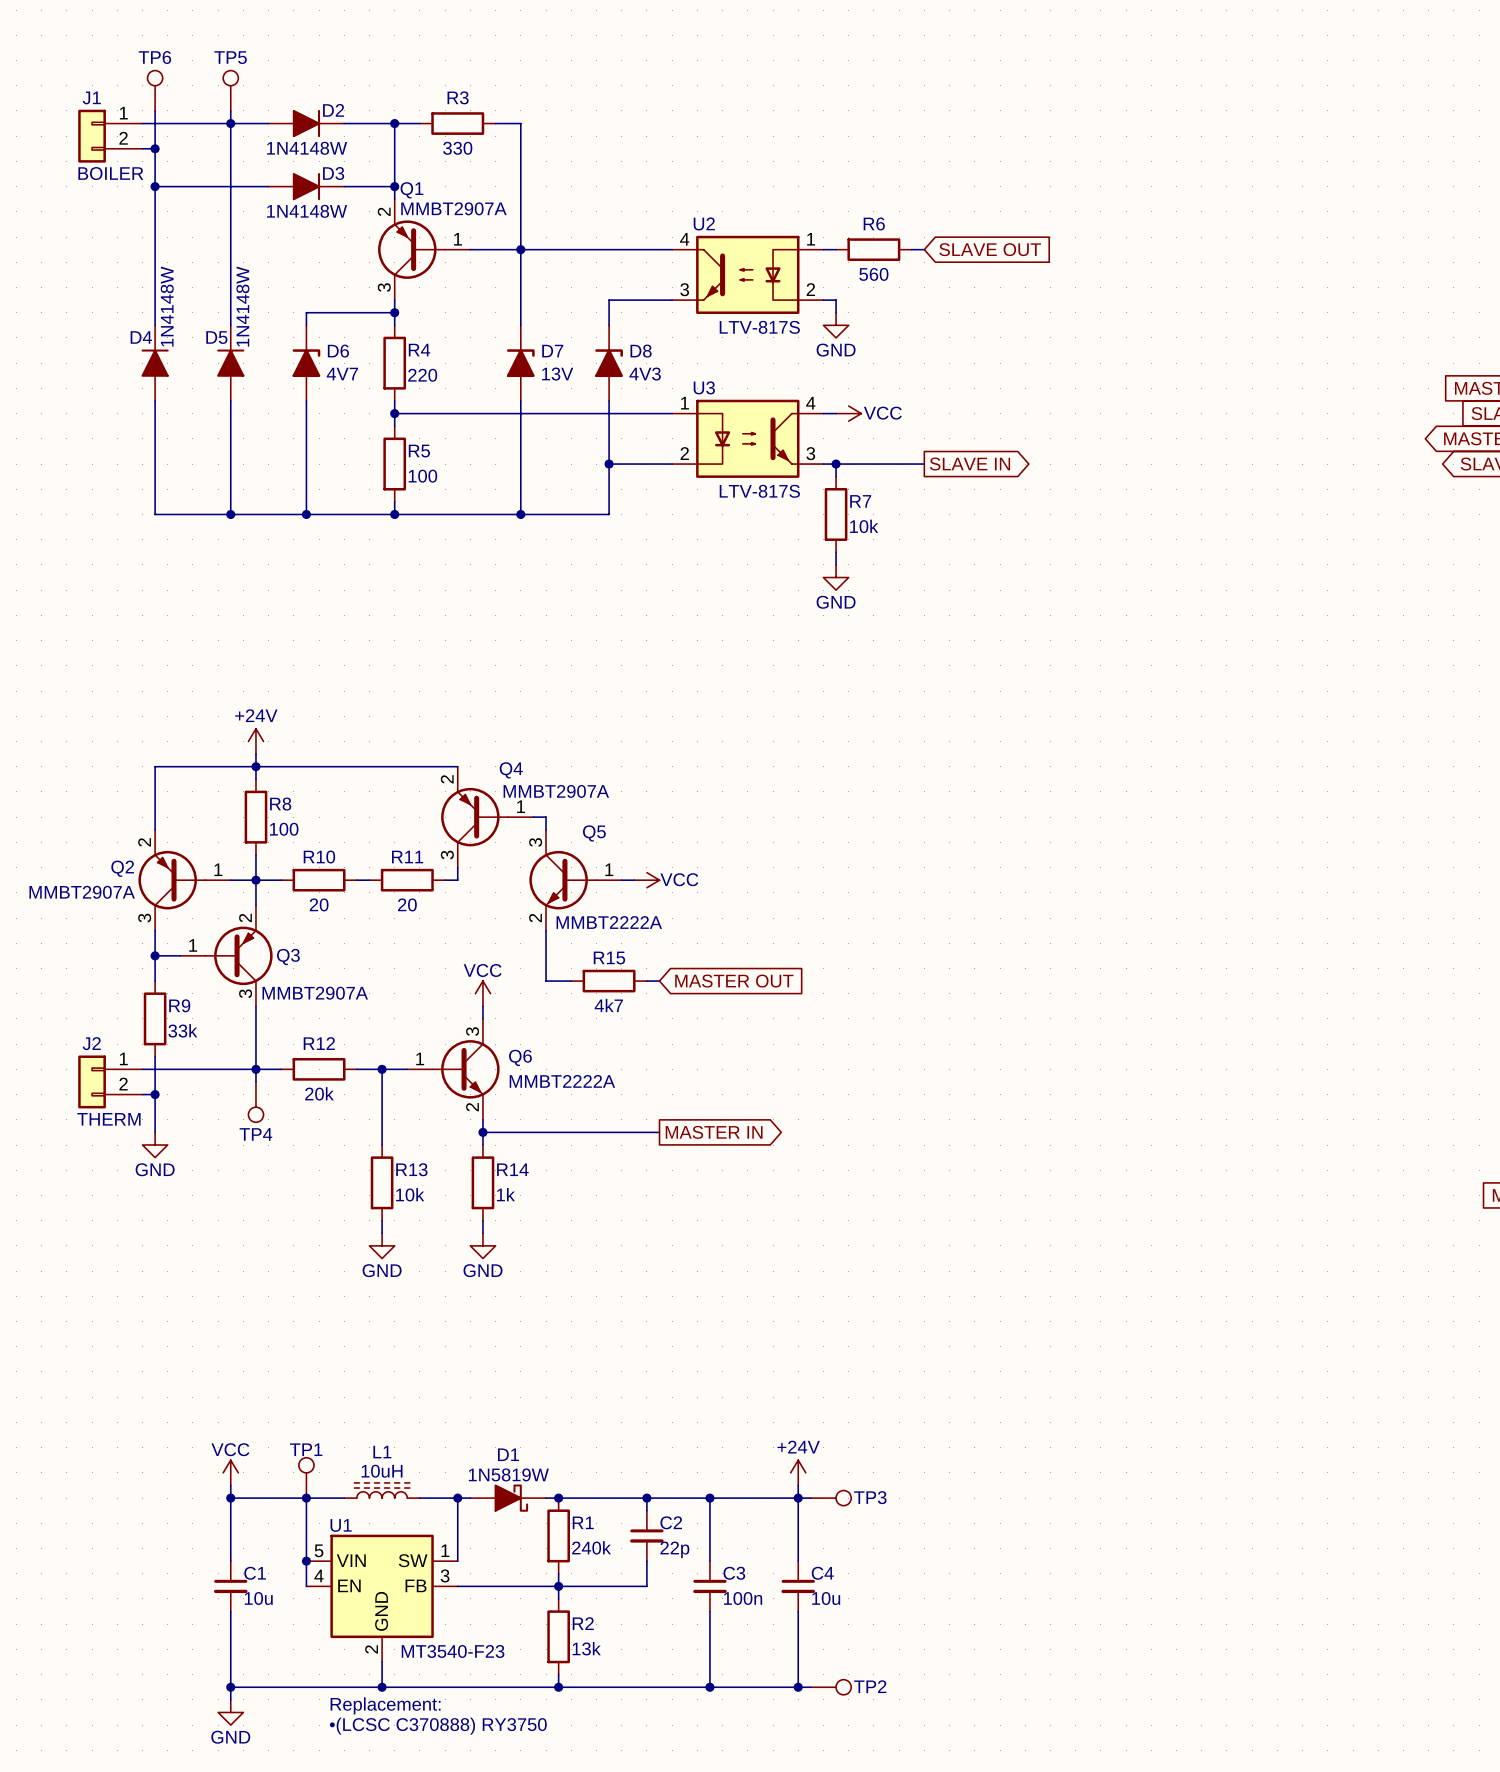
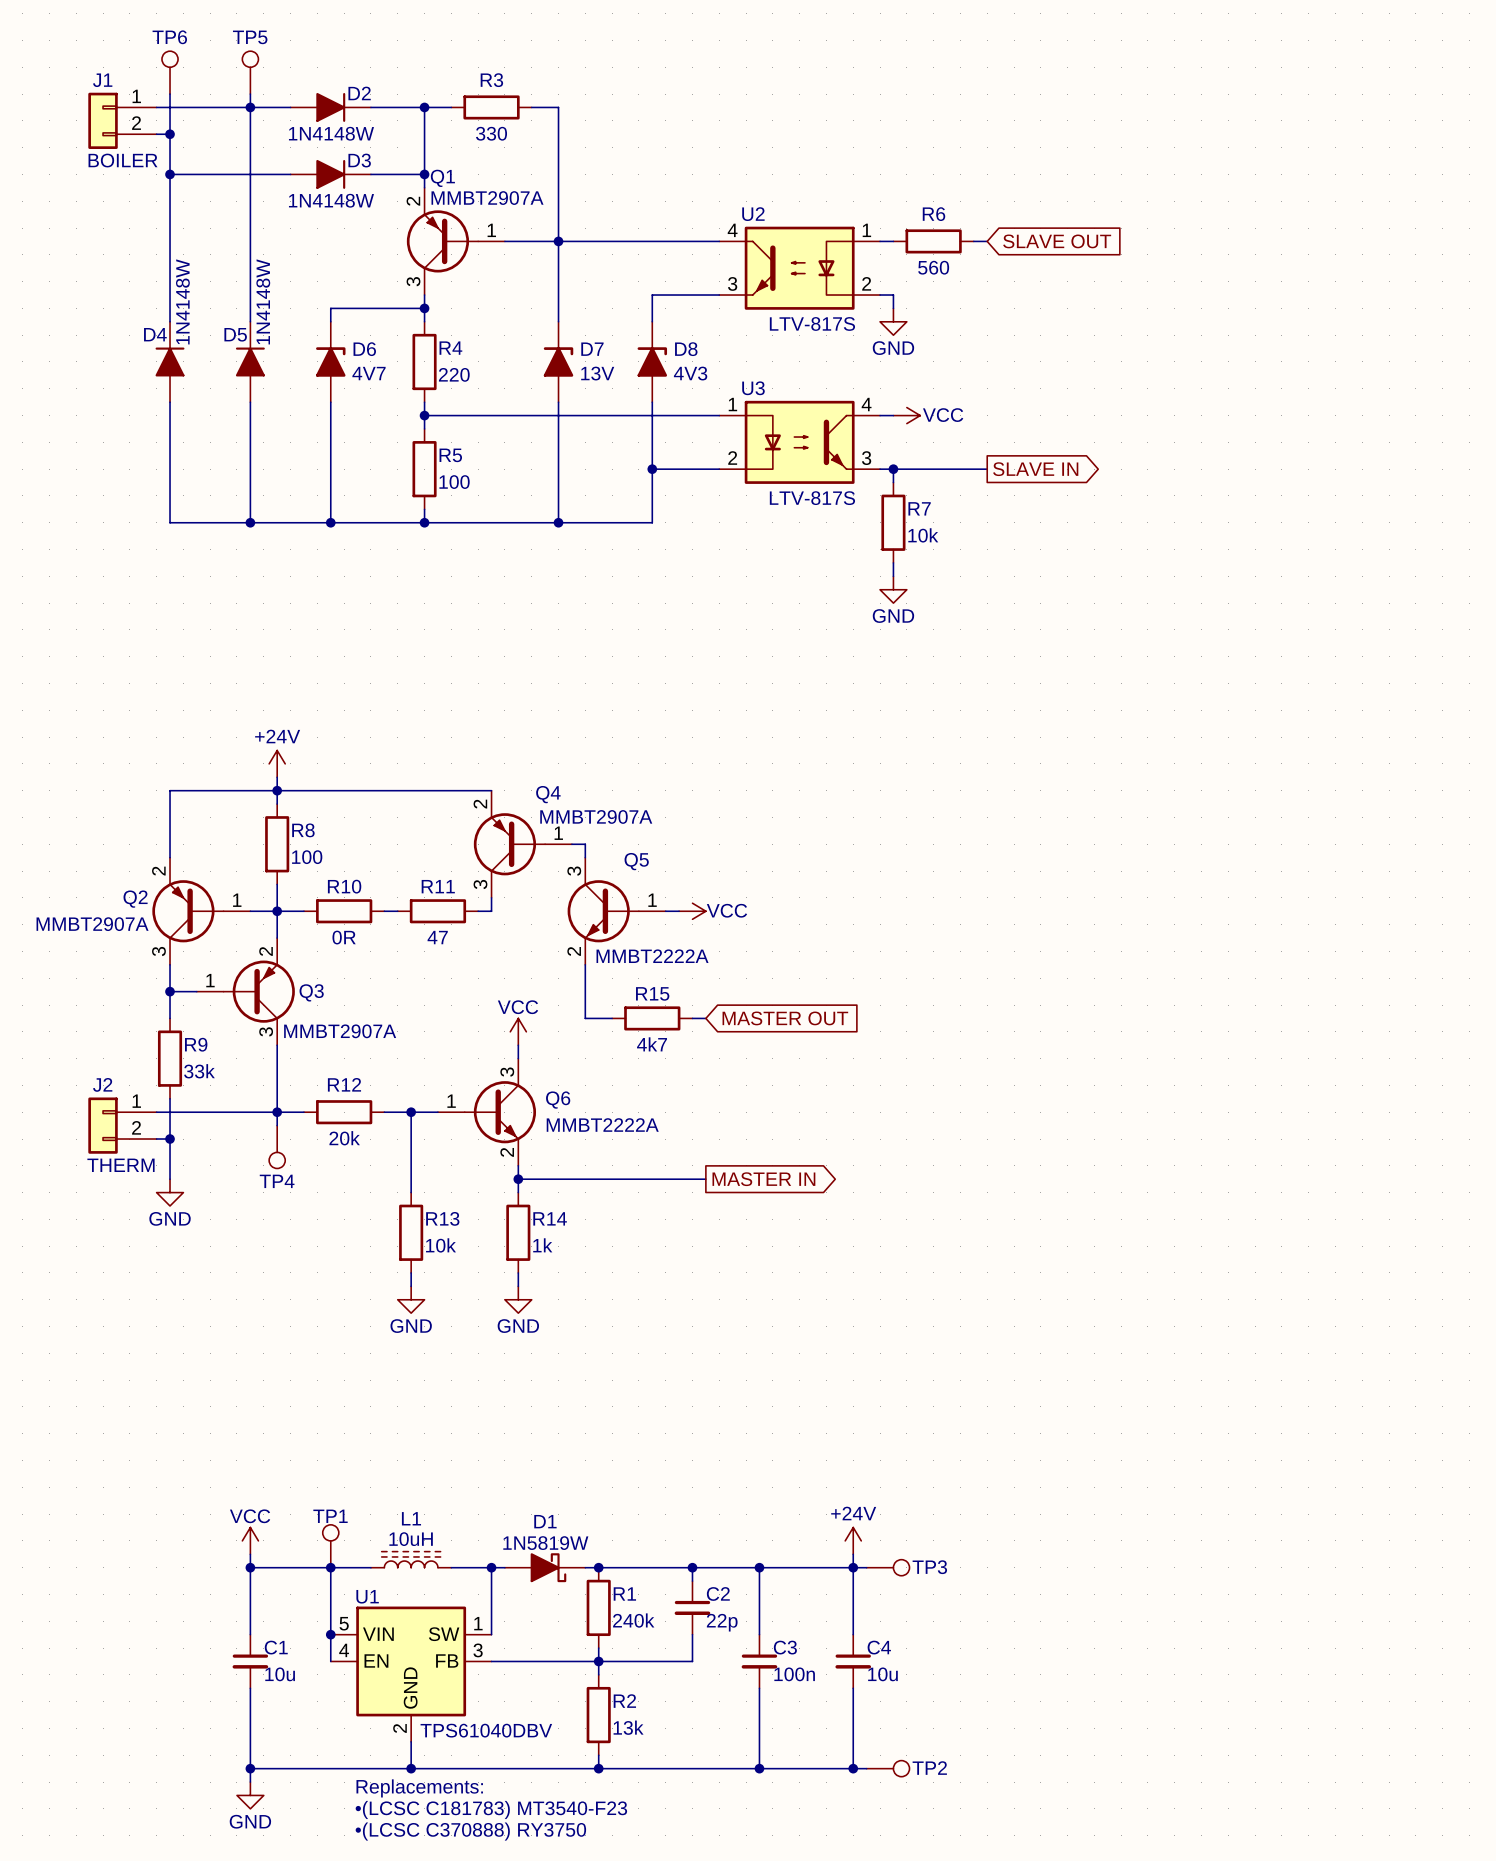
R10 value: 20 (319, 904) -> 0R (344, 937)
R11 value: 20 (407, 904) -> 47 (437, 937)
U1 value: MT3540-F23 (453, 1651) -> TPS61040DBV (486, 1730)
text: Replacement: (385, 1705) -> Replacements: (419, 1788)
text: •(LCSC C370888) RY3750 (438, 1726) -> •(LCSC C181783) MT3540-F23 (491, 1809)
text: none -> •(LCSC C370888) RY3750 (470, 1831)

